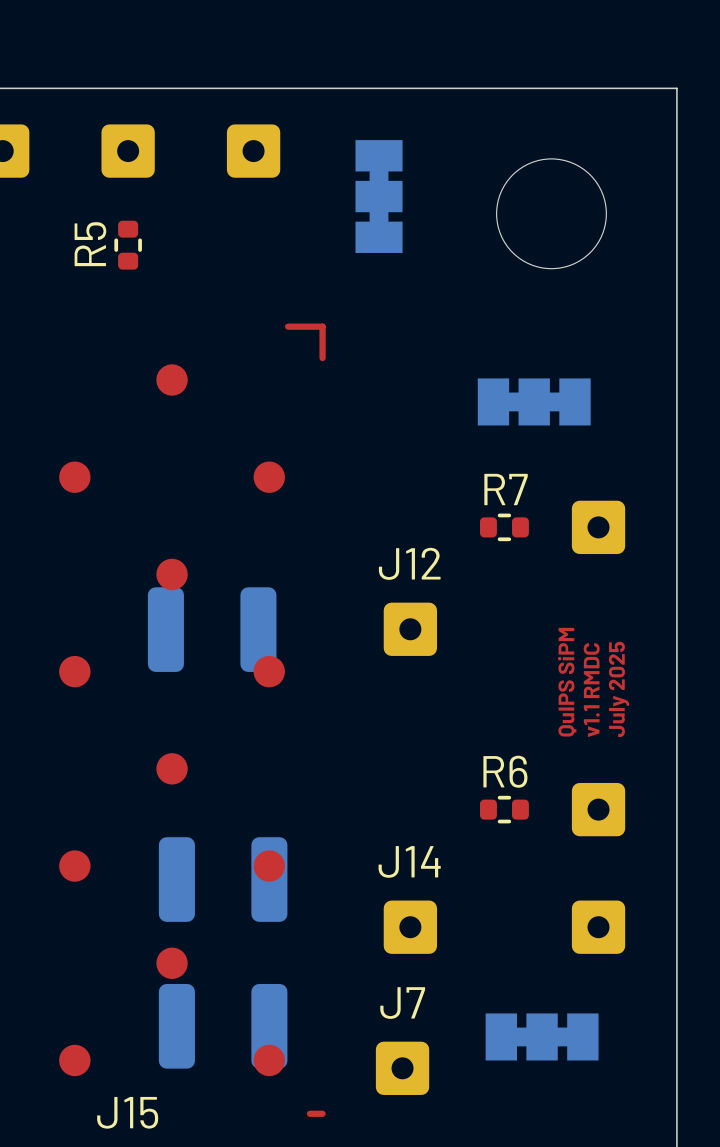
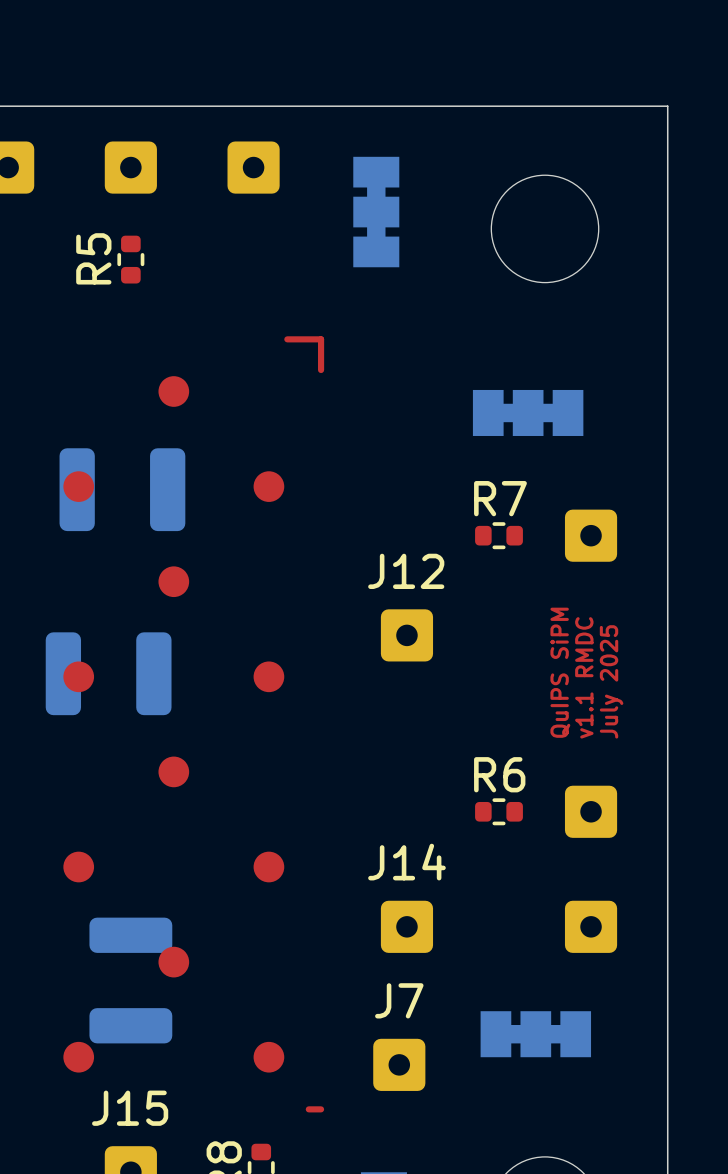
part: none -> (122, 489)
part: (212, 629) -> none
part: none -> (108, 673)
part: (223, 879) -> none
part: none -> (130, 980)
part: (223, 1026) -> none

